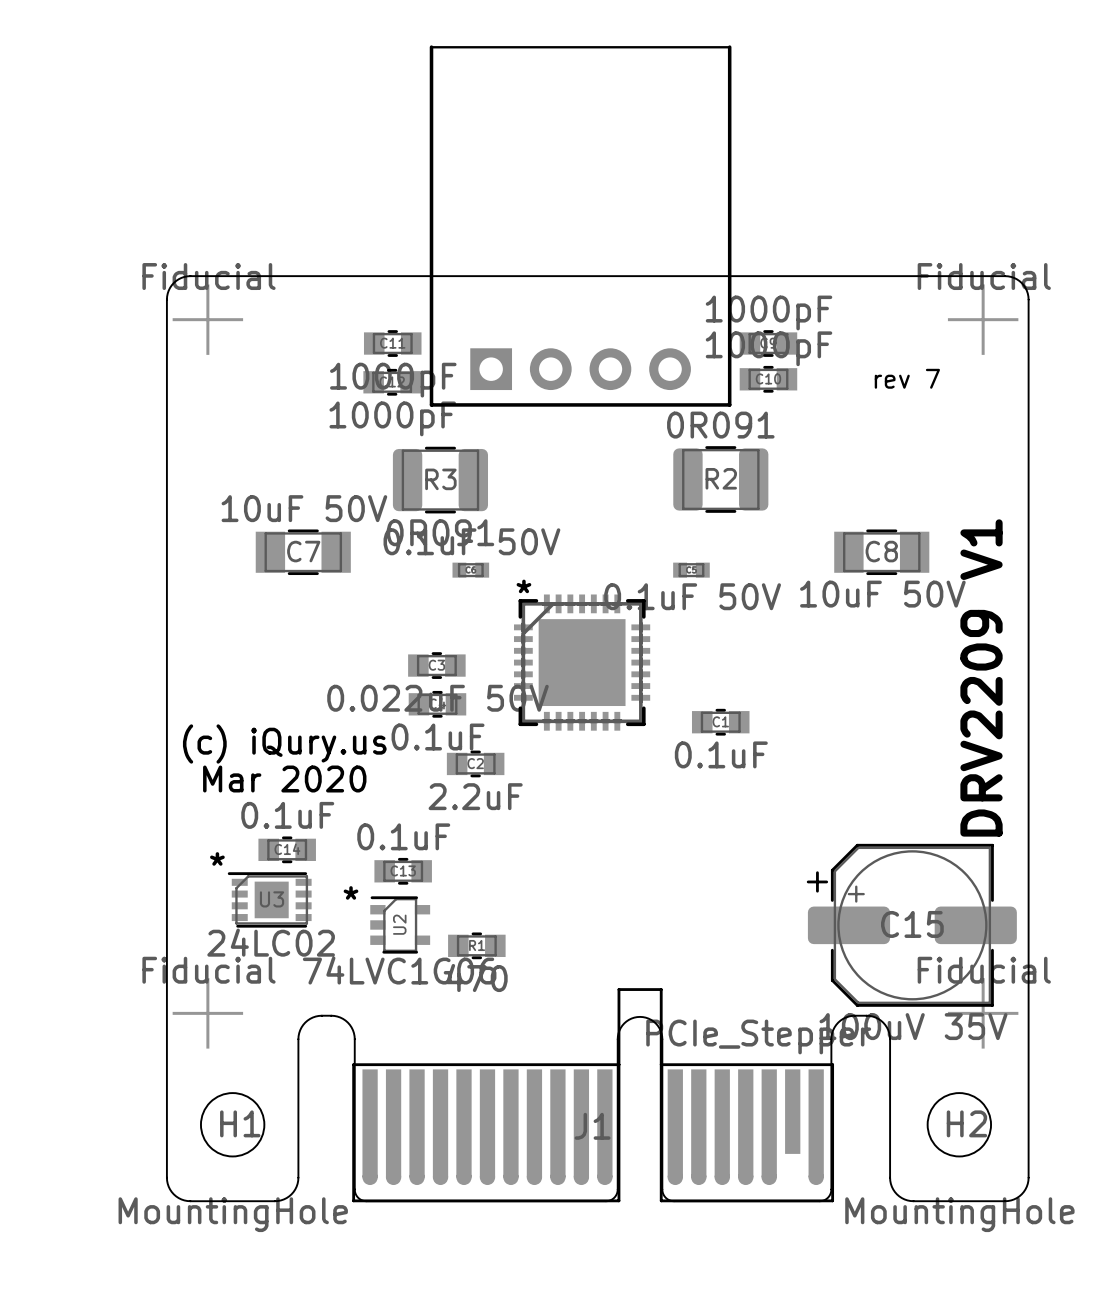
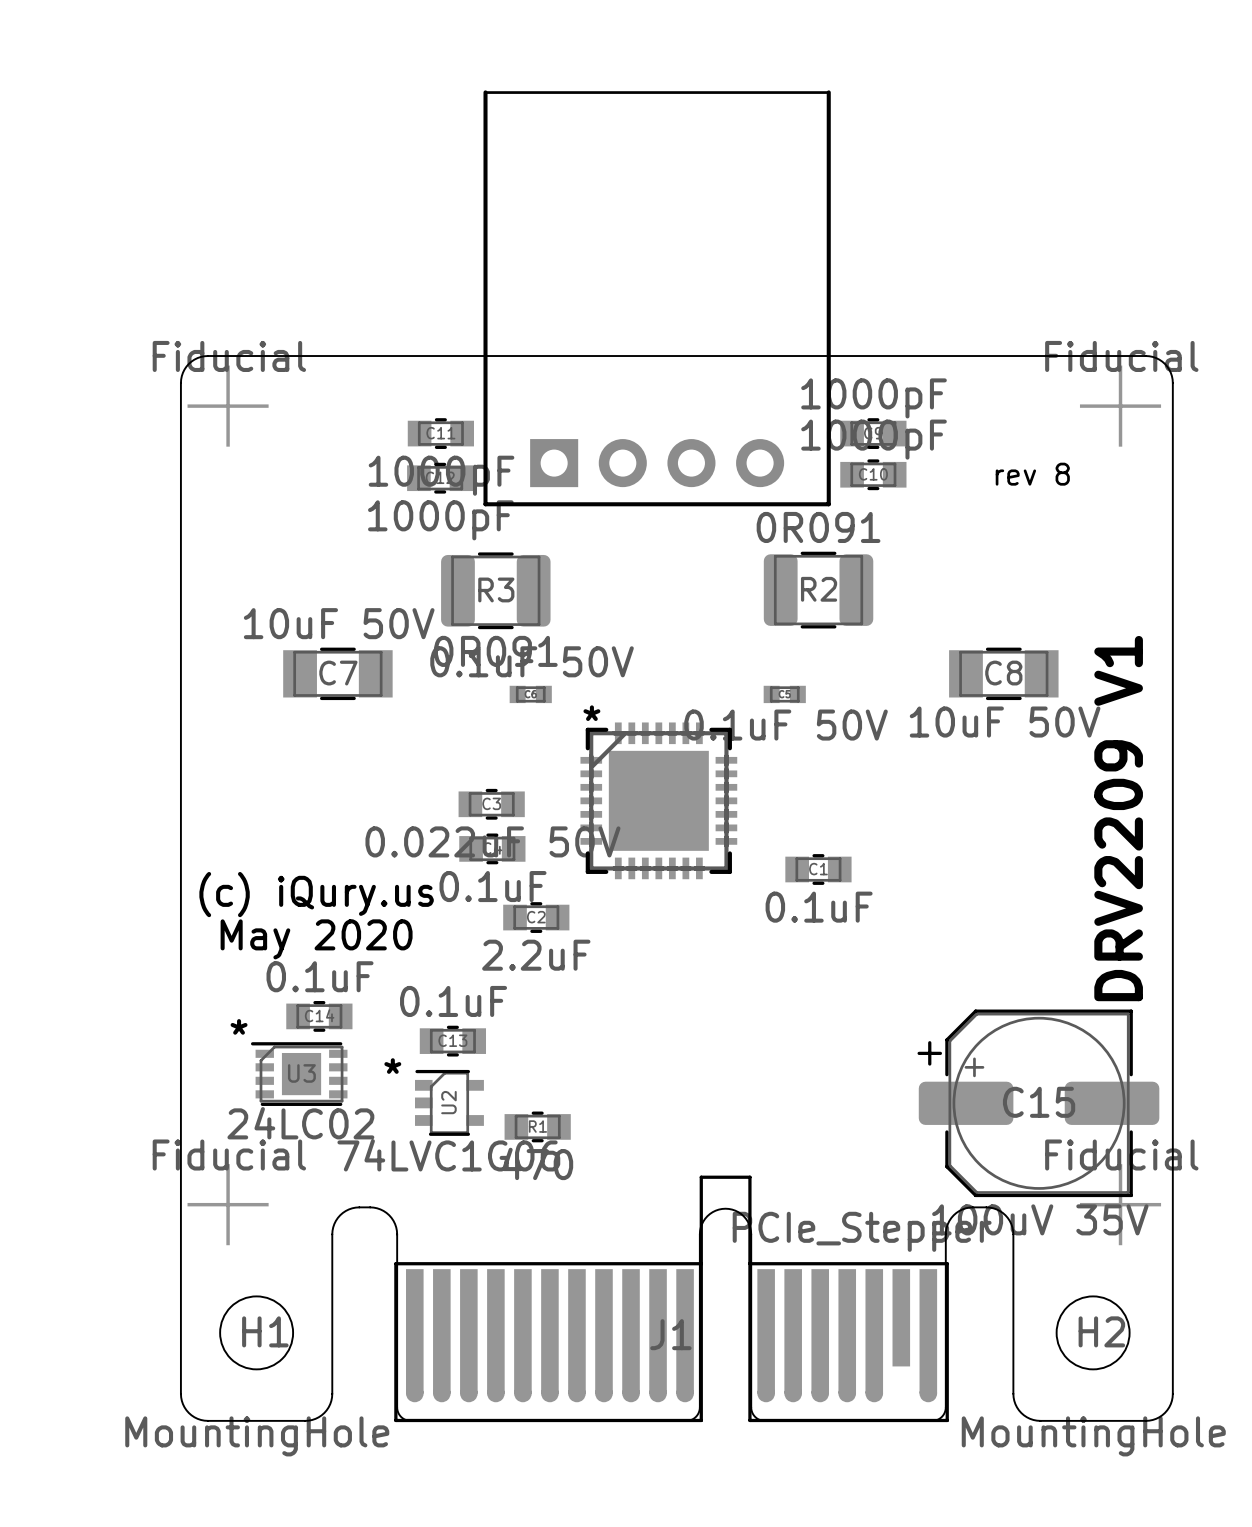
text: rev 7 (907, 378) -> rev 8 (1032, 474)
text: Mar 2020 (284, 779) -> May 2020 (316, 939)

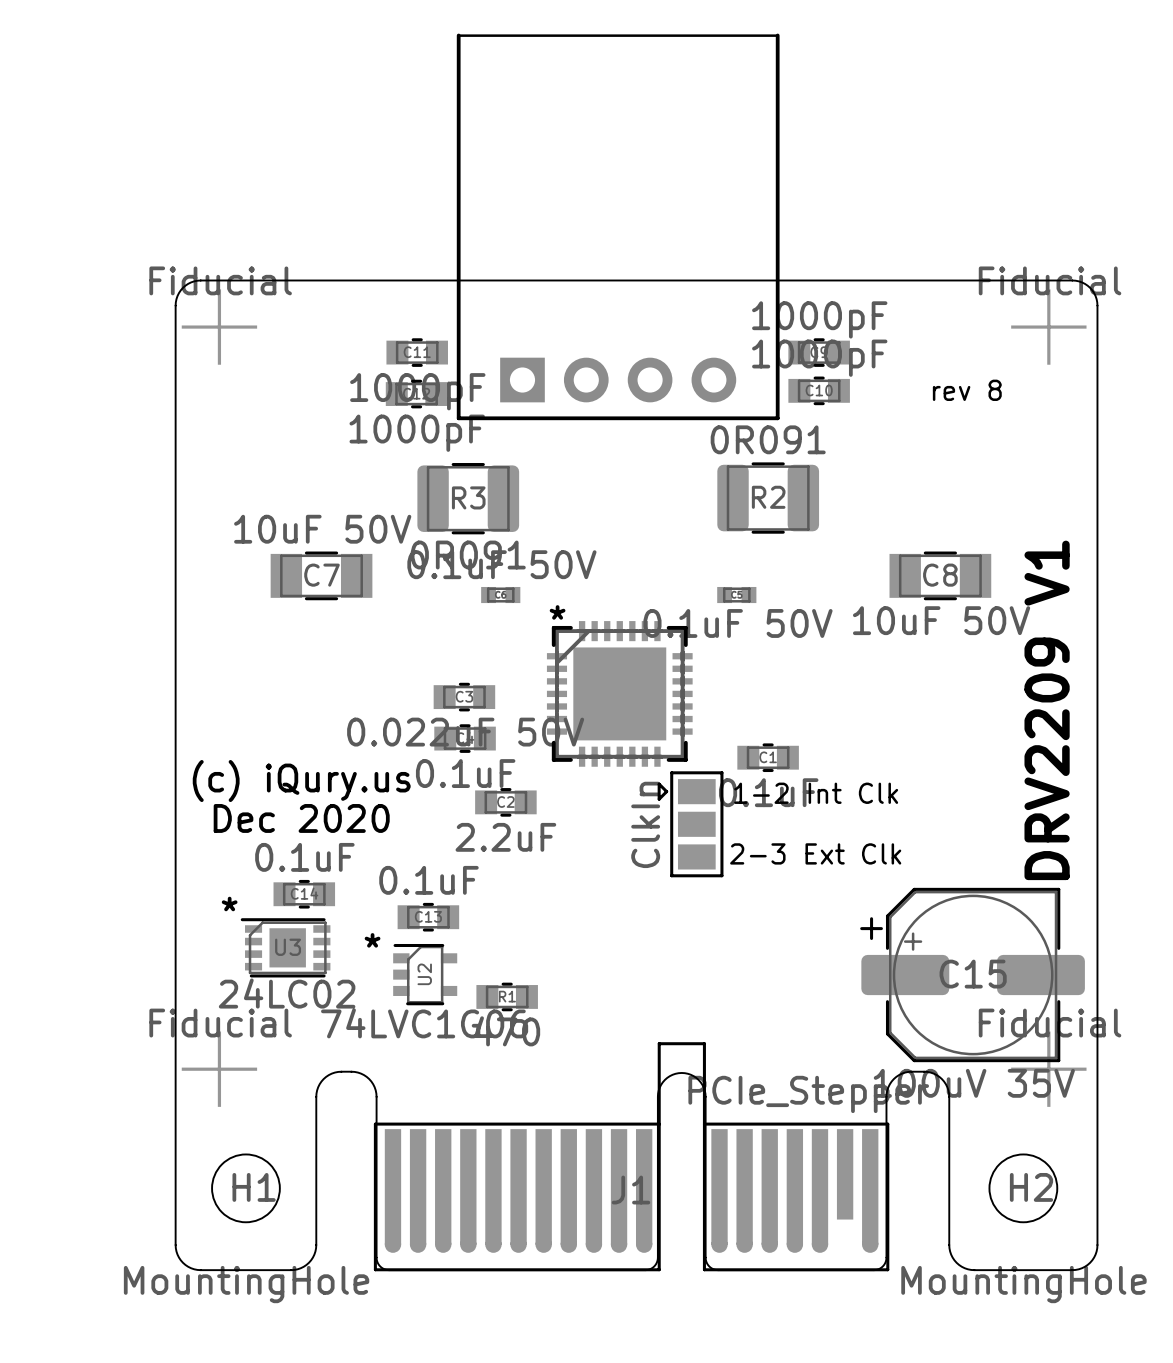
text: none -> 1-2 Int Clk (816, 793)
text: May 2020 (316, 939) -> Dec 2020 (301, 818)
part: none -> ClkIn (690, 824)
text: none -> 2-3 Ext Clk (815, 853)

